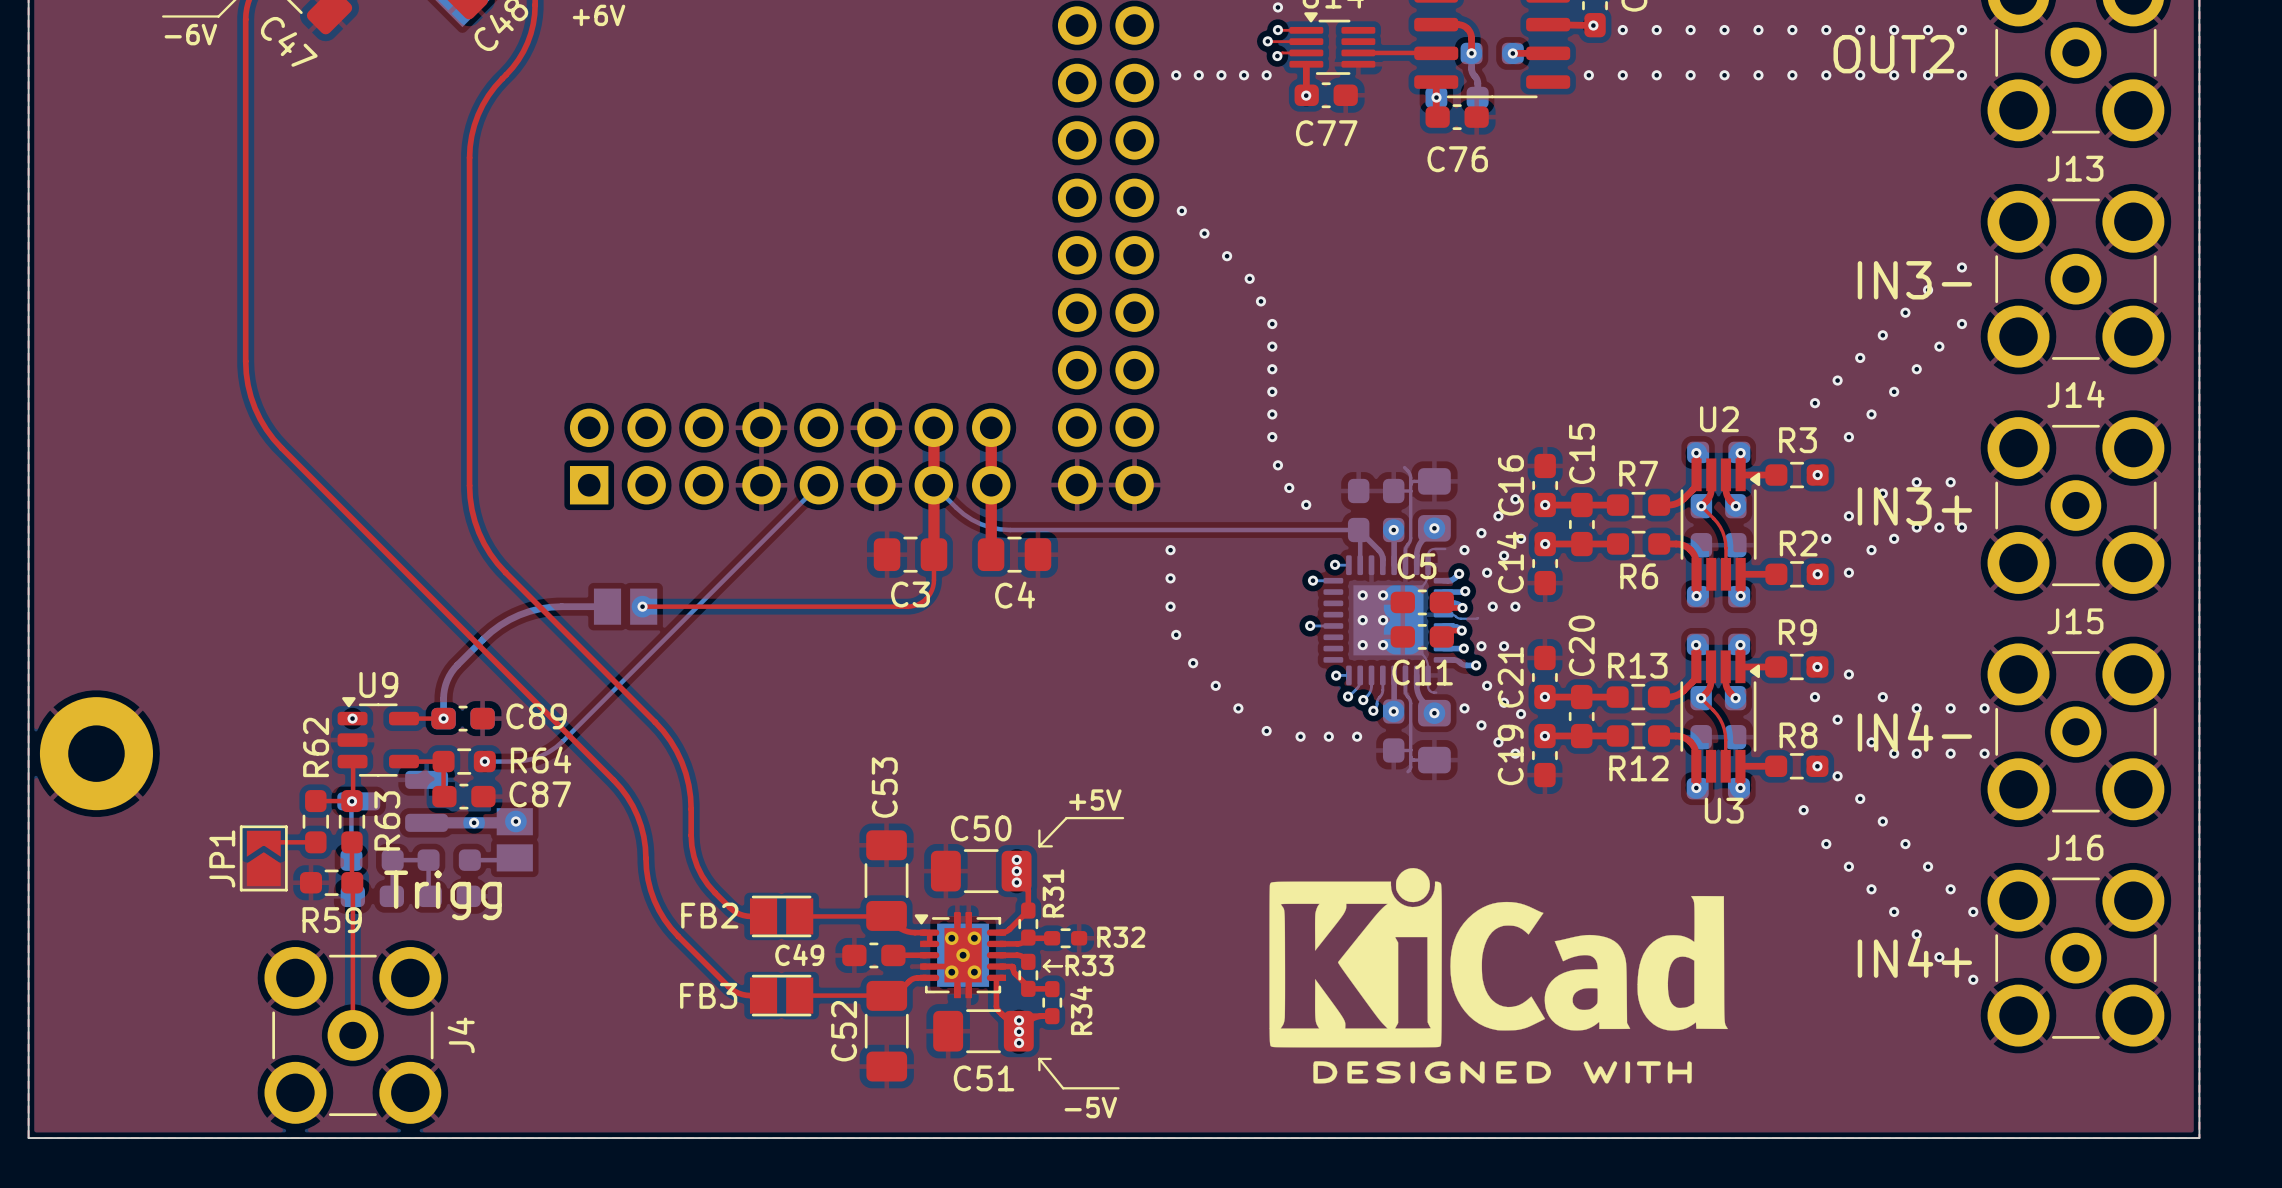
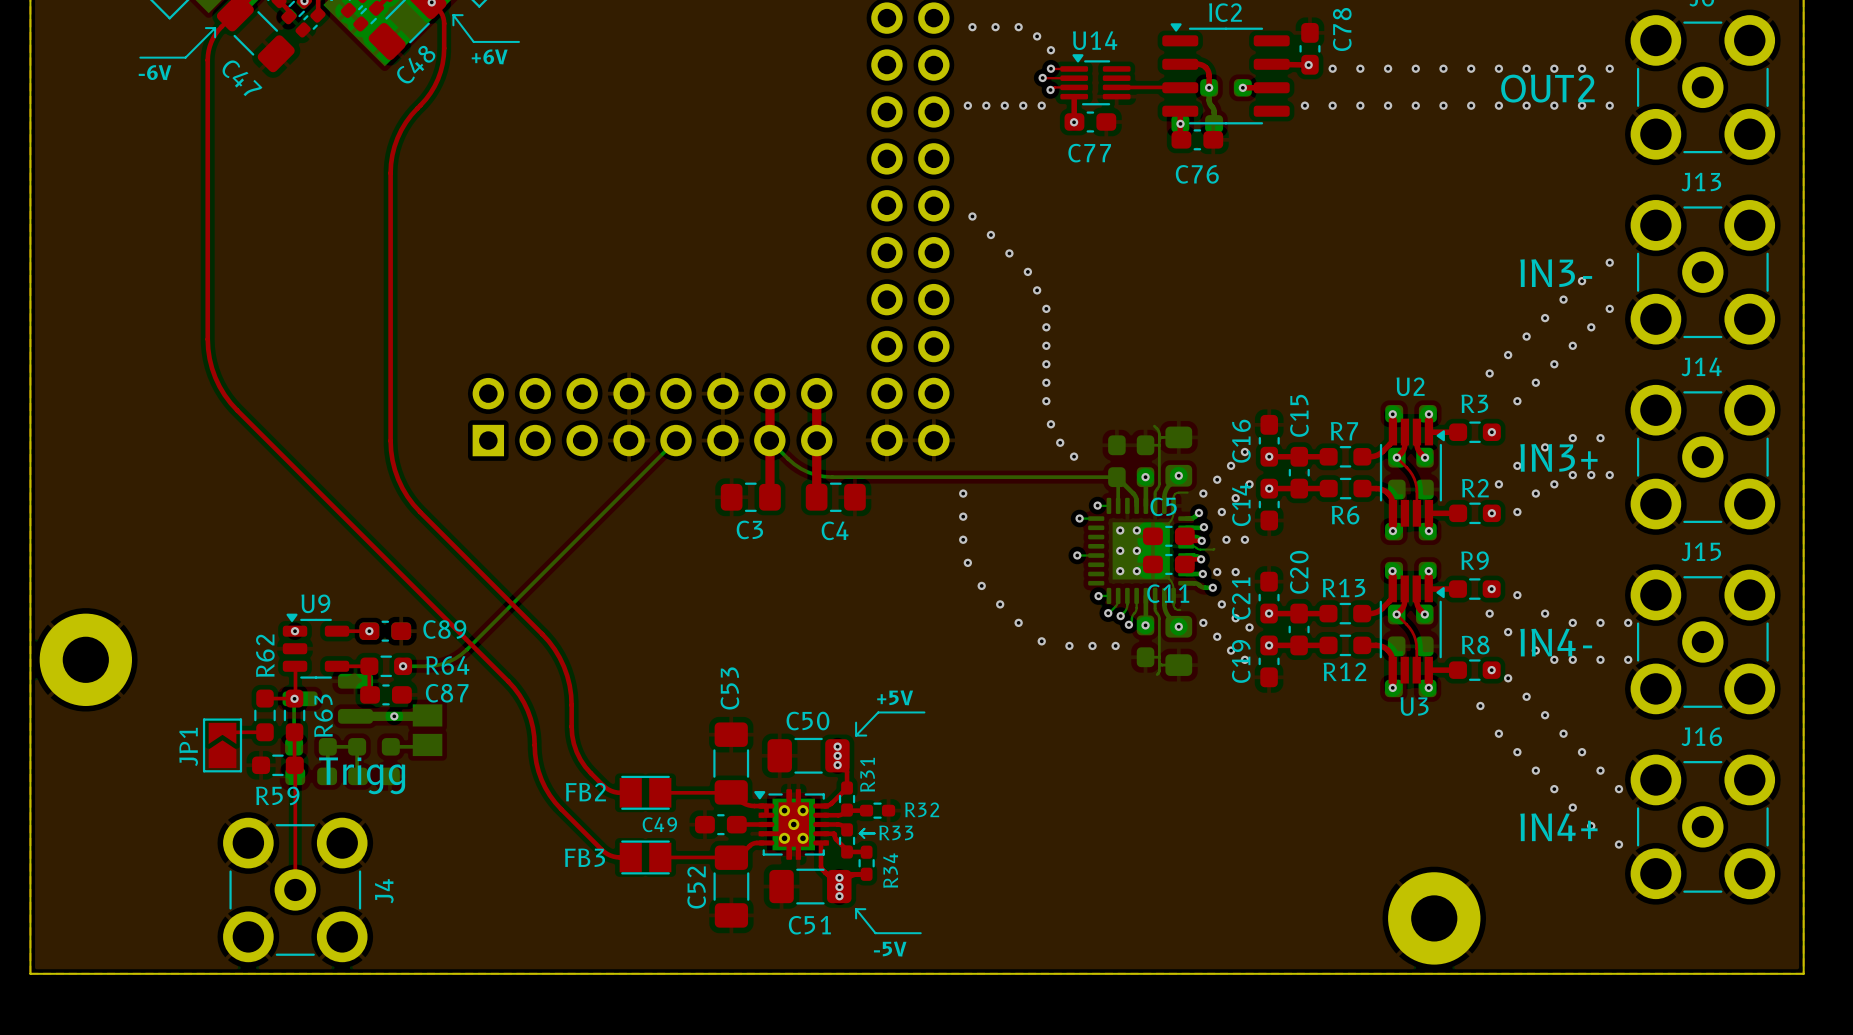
top track: (933, 554) (931, 590) (923, 601) (910, 606) (642, 606) -> none
bottom track: (607, 606) (540, 608) (519, 615) (500, 625) (483, 639) (451, 672) (444, 689) (443, 718) -> none
part: (625, 606) -> none
via: (642, 606) -> none
via: (515, 821) -> none
drawing: [1269, 868, 1728, 1084] -> none
part: none -> (1434, 918)

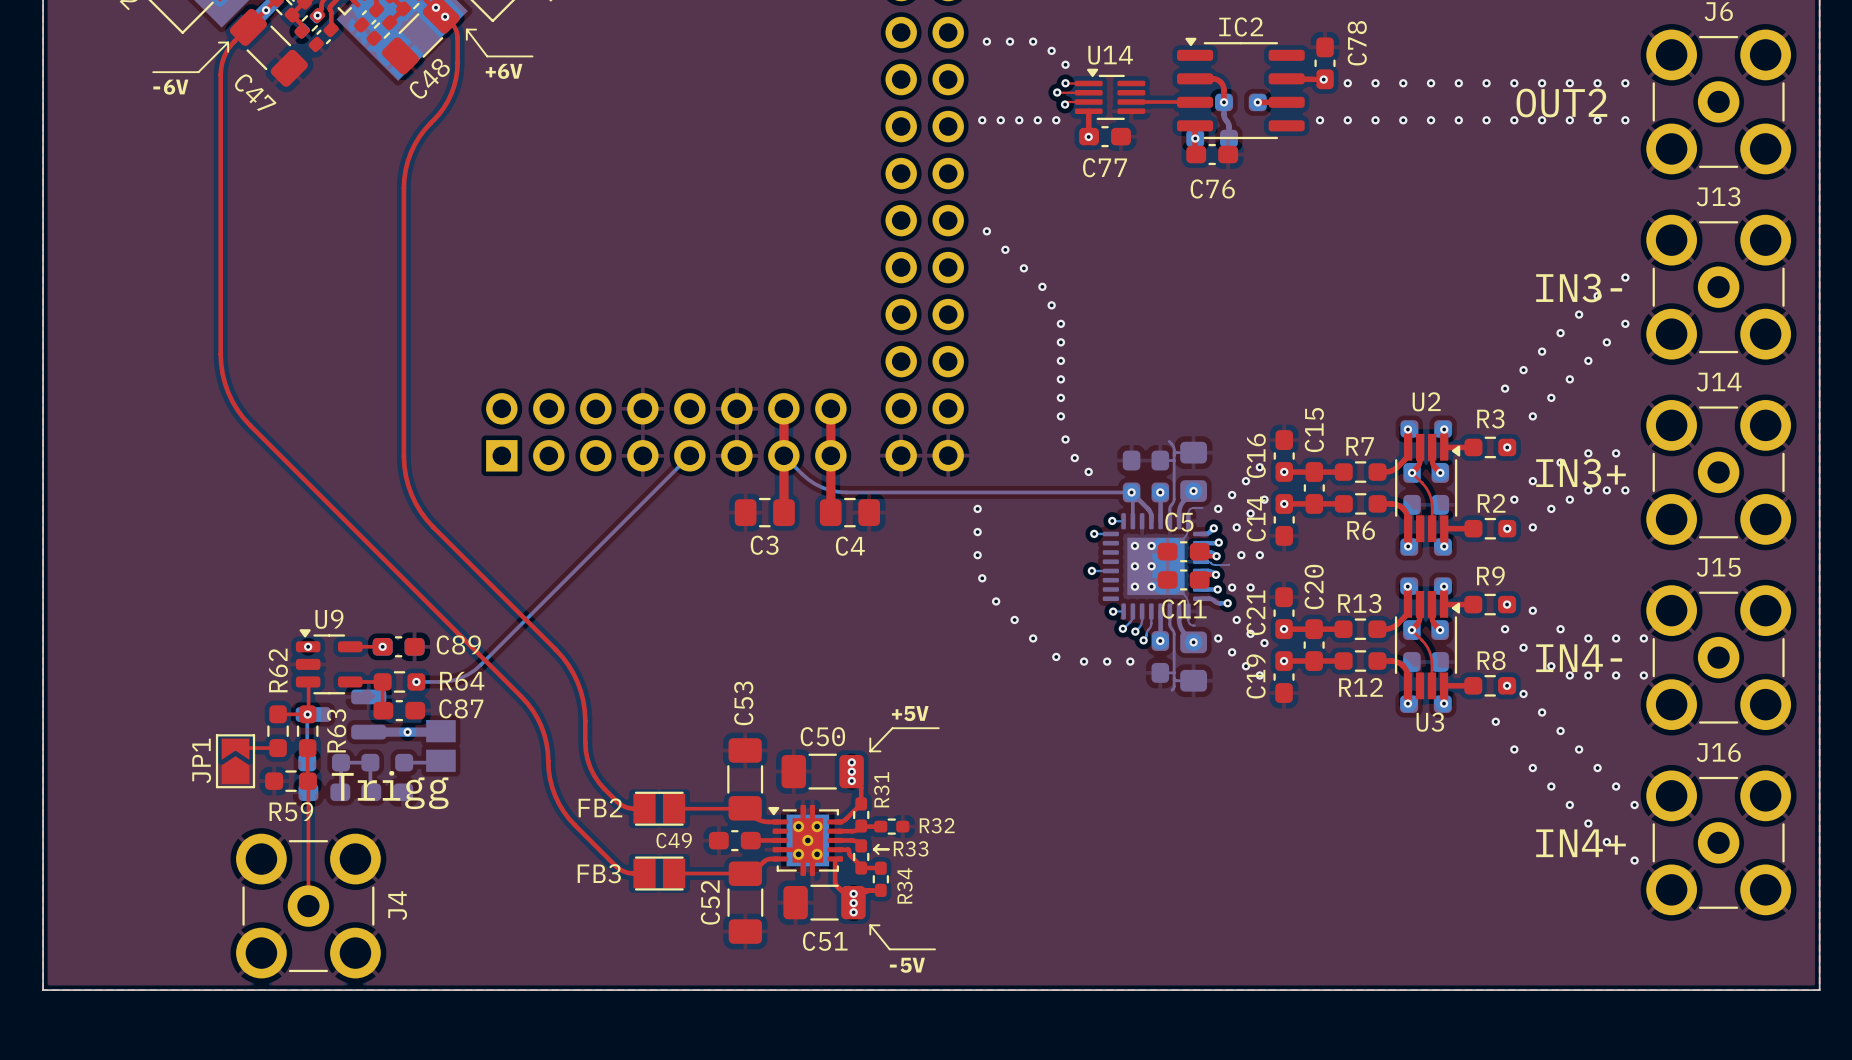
via: none -> (1131, 492)
part: (85, 659) -> none
top track: (766, 806) (766, 815) -> none
part: (1434, 918) -> none

